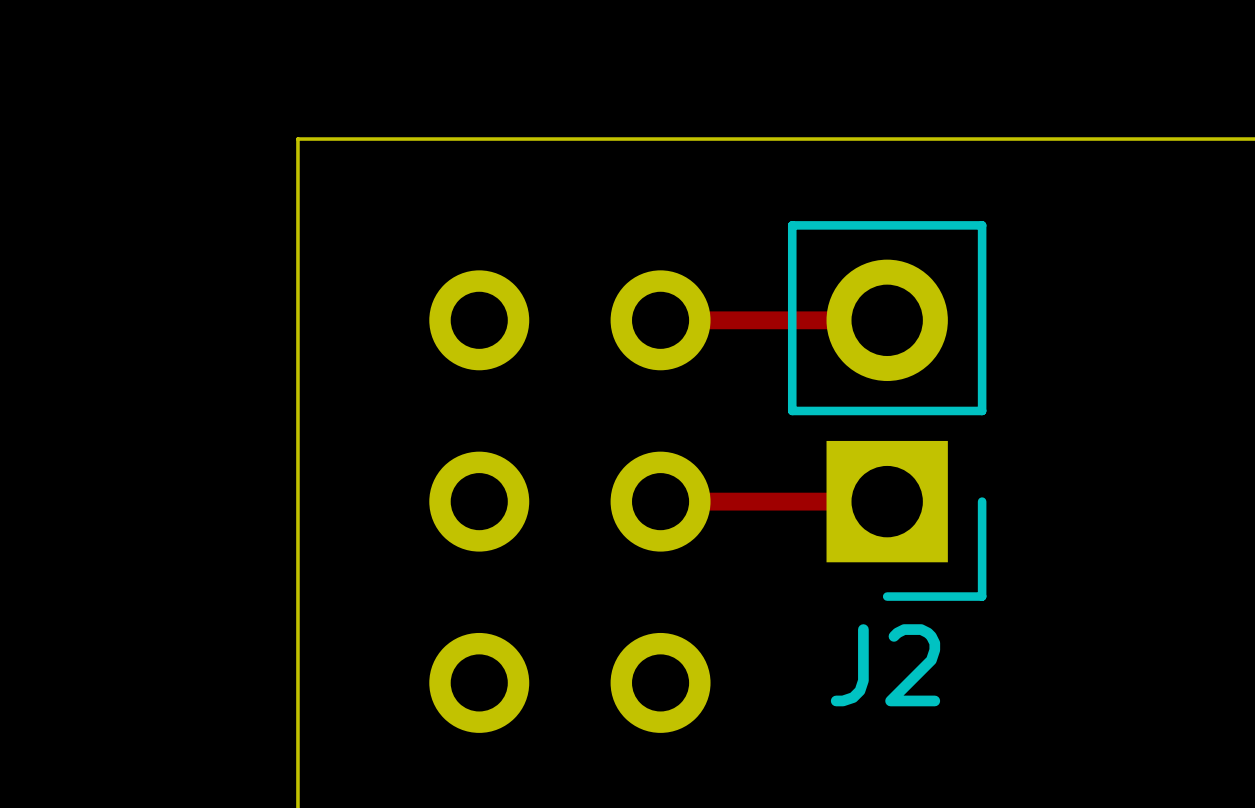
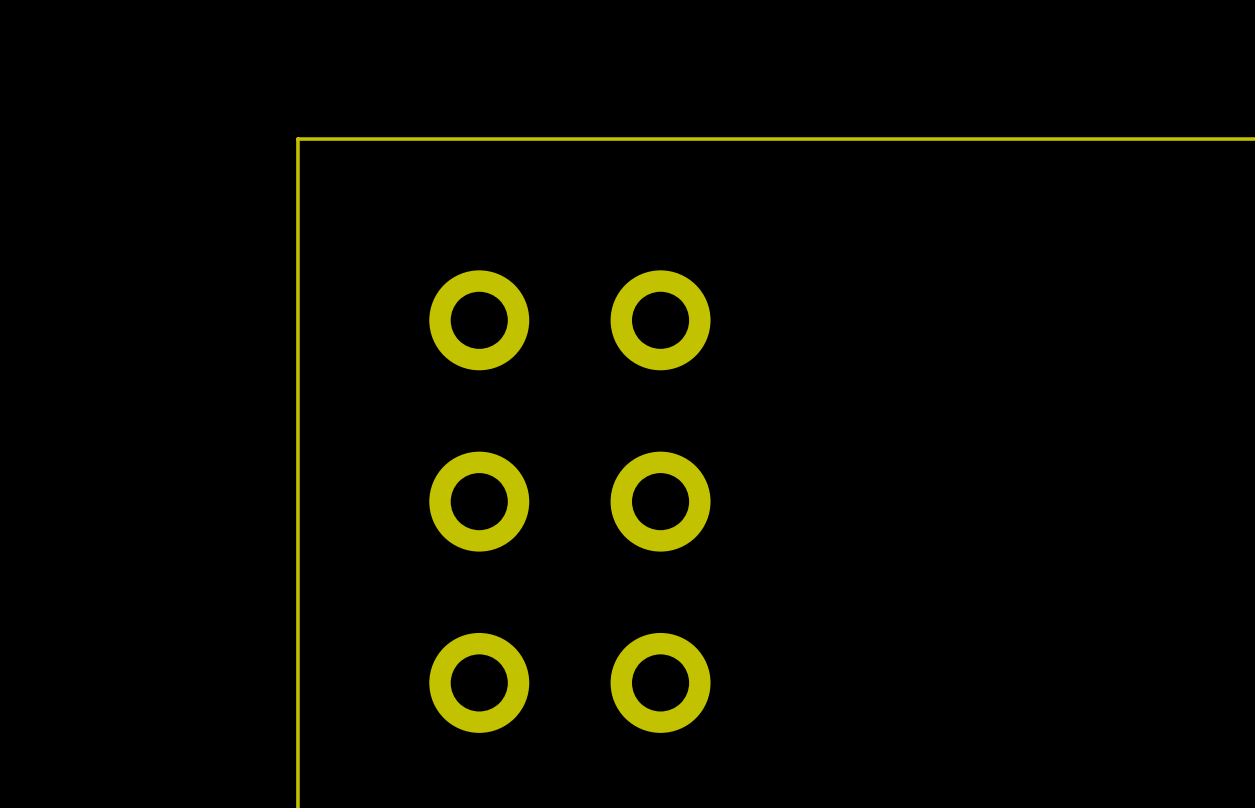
track: (660, 320) (887, 320) -> none
J2: (887, 410) -> none
track: (660, 501) (887, 501) -> none

